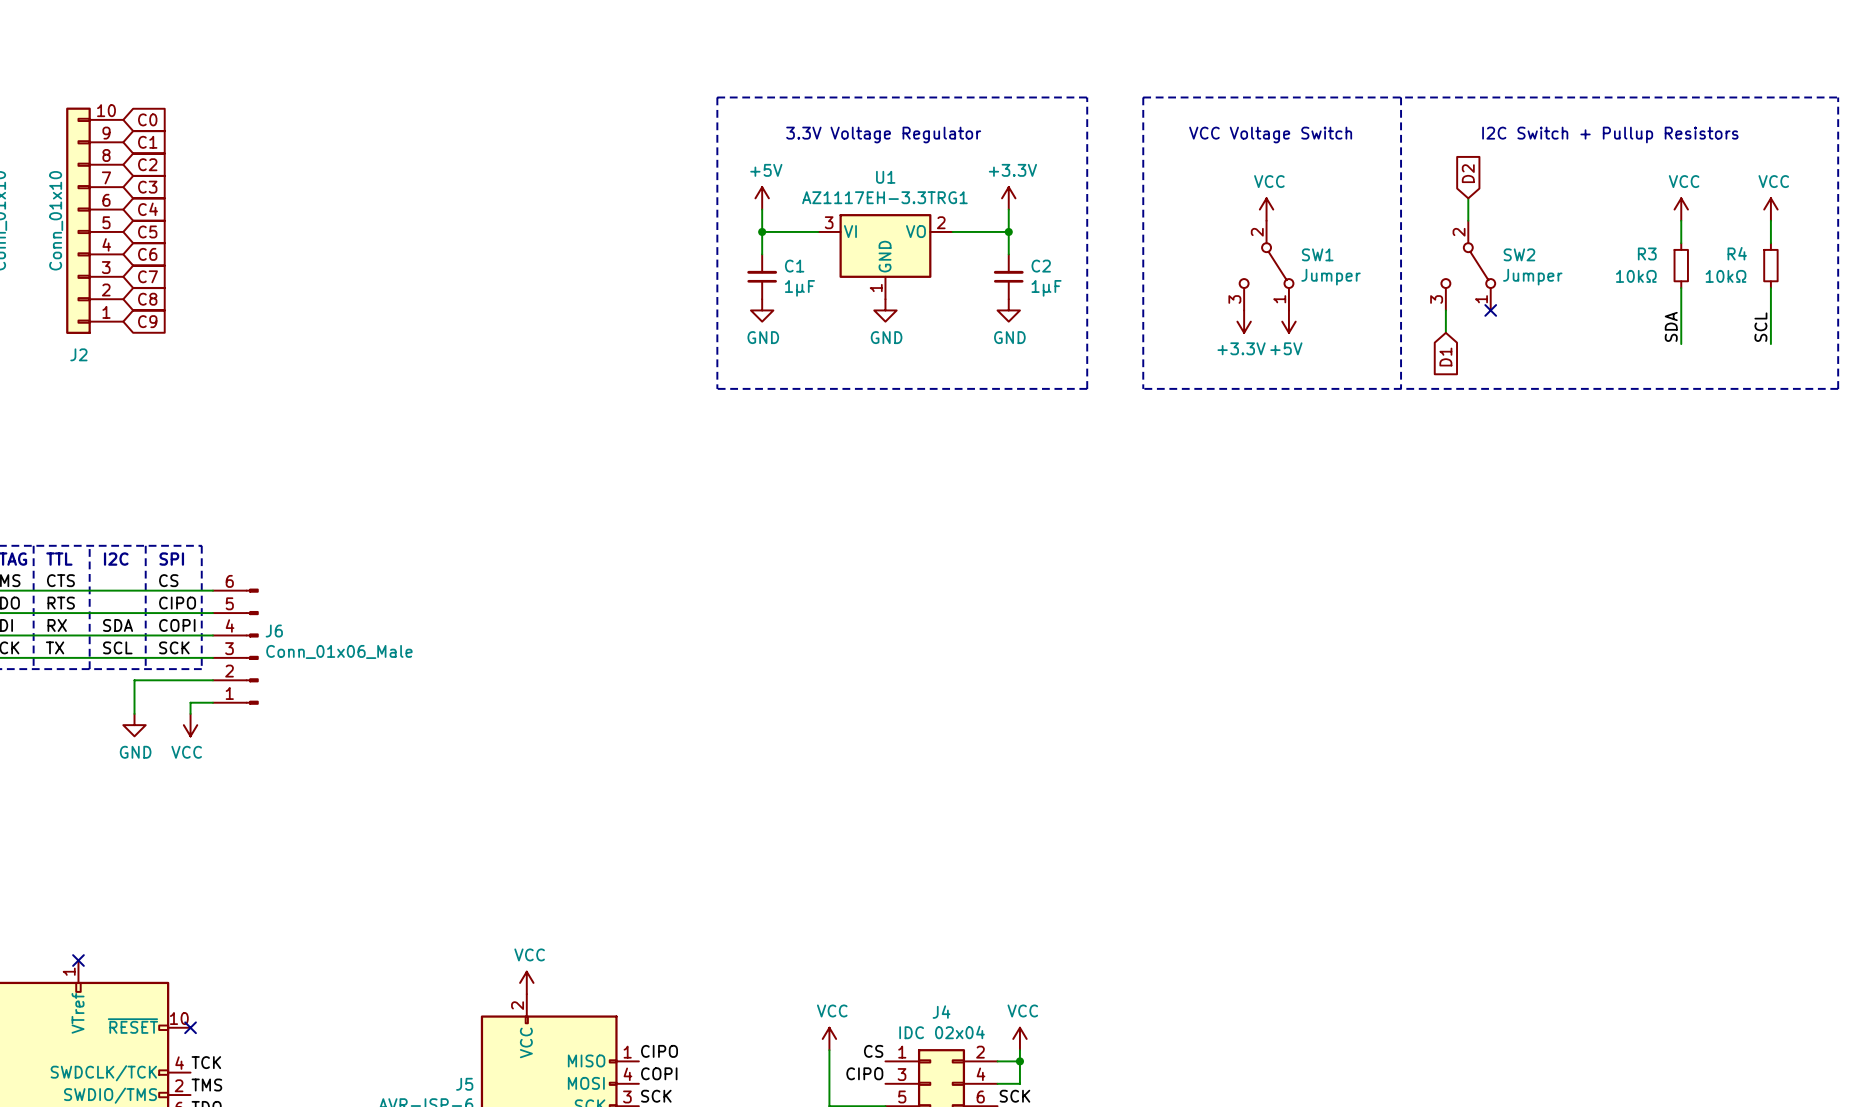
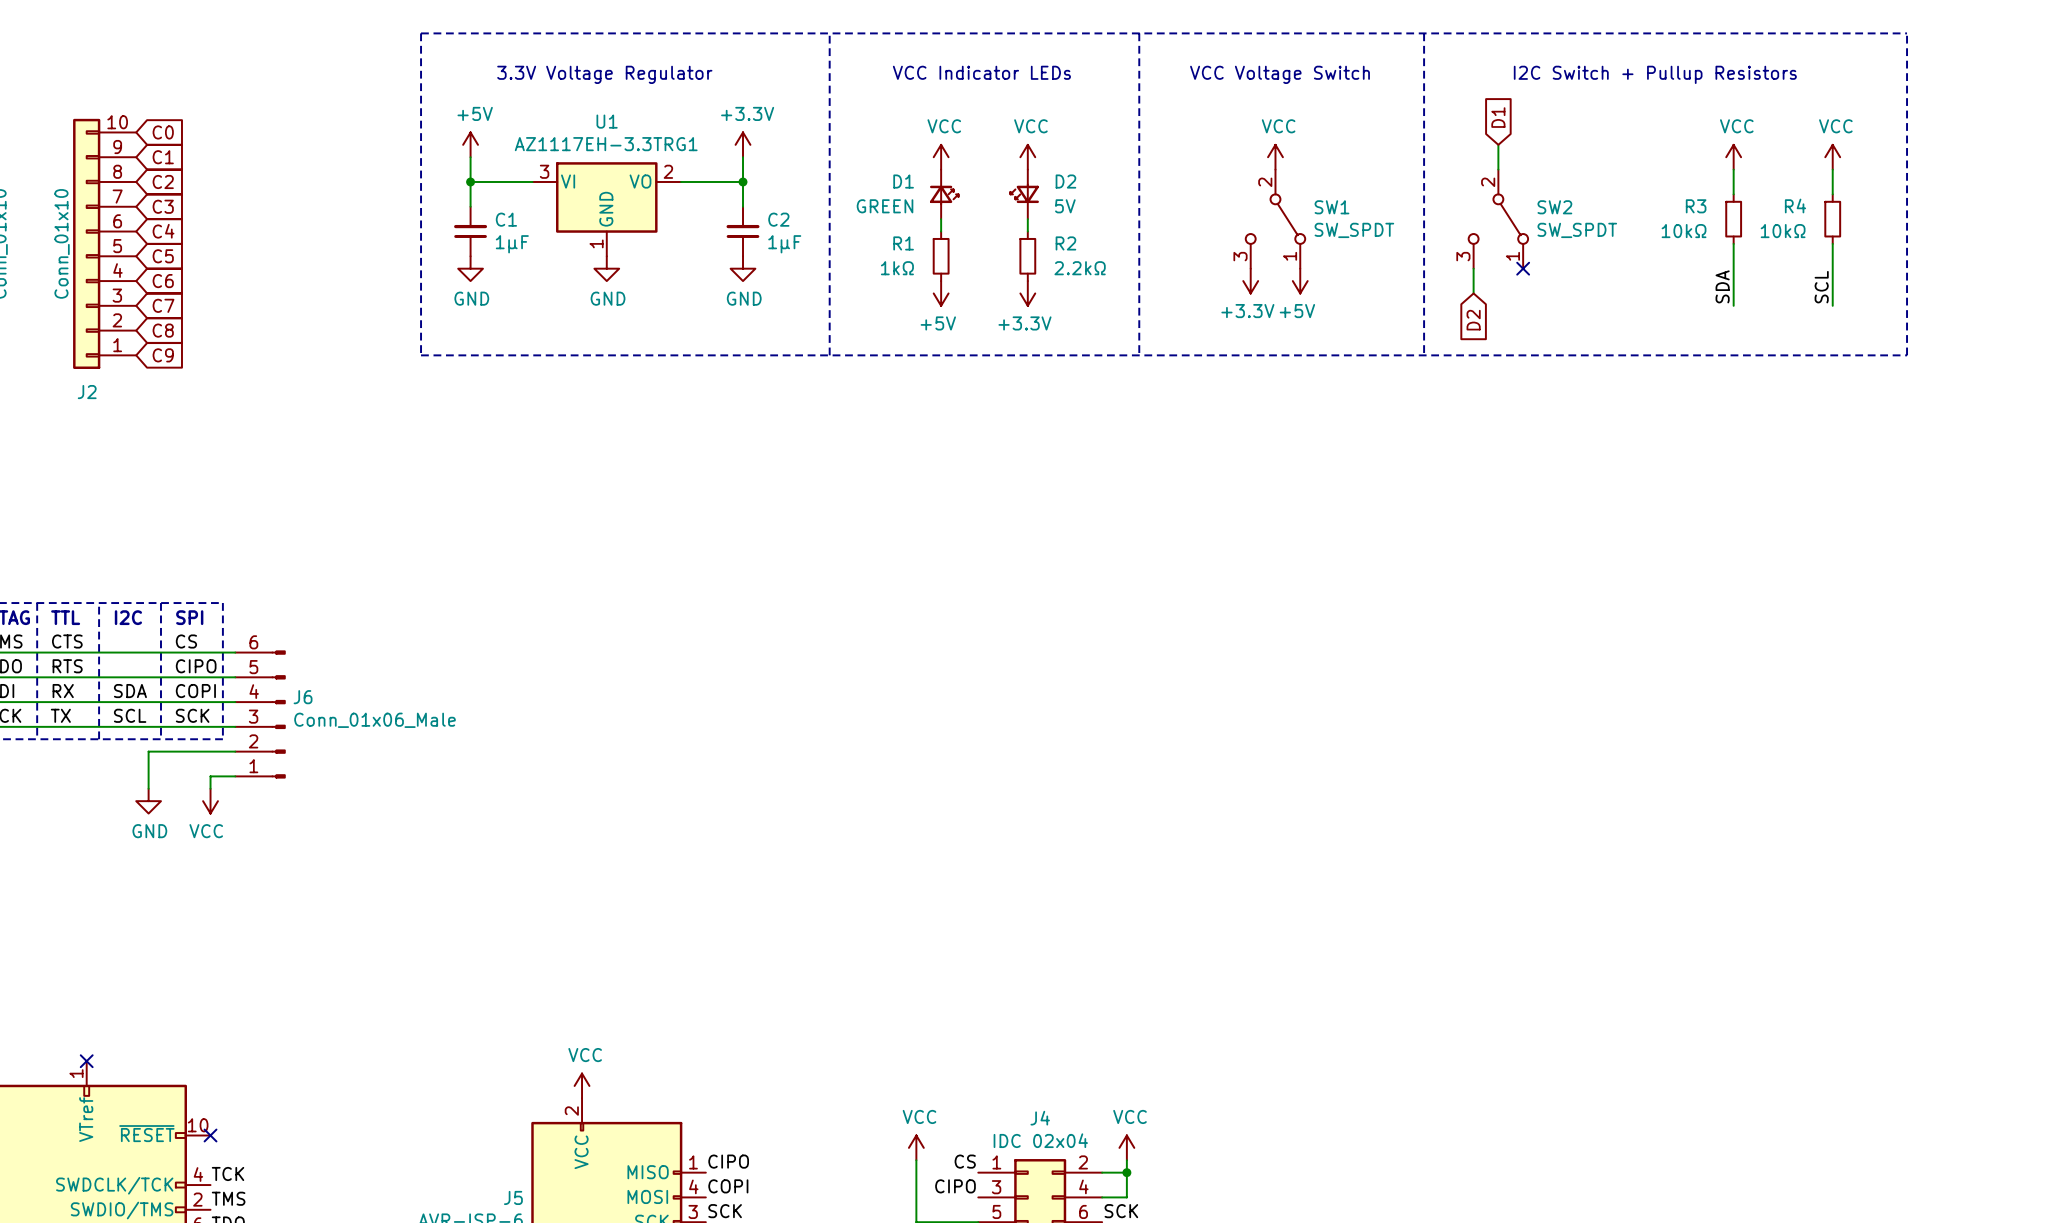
line: none -> (421, 33) (421, 355) (1907, 355) (1907, 33) (421, 33)
line: none -> (829, 33) (829, 355)
line: none -> (1139, 33) (1139, 355)
text: none -> VCC Indicator LEDs (981, 72)
text: none -> 3.3V Voltage Regulator (604, 74)
line: (717, 97) (717, 388) (1087, 388) (1087, 97) (717, 97) -> none
line: (1143, 97) (1143, 388) (1838, 388) (1838, 97) (1143, 97) -> none
line: (1401, 97) (1401, 388) -> (1424, 33) (1424, 355)
global label: none -> D1 (1498, 117)
power symbol: none -> +5V (470, 144)
power symbol: none -> +3.3V (743, 144)
text: 3.3V Voltage Regulator (883, 134) -> none
text position: VCC Voltage Switch (1270, 134) -> VCC Voltage Switch (1280, 74)
text position: I2C Switch + Pullup Resistors (1610, 134) -> I2C Switch + Pullup Resistors (1655, 74)
wire: none -> (470, 157) (470, 206)
power symbol: none -> VCC (941, 157)
power symbol: none -> VCC (1027, 157)
power symbol: none -> VCC (1733, 157)
power symbol: none -> VCC (1832, 157)
wire: none -> (470, 181) (532, 181)
junction: none -> (470, 181)
junction: none -> (743, 181)
global label rotation: 0° (1468, 173) -> 180° (1473, 320)
global label position: D2 (1468, 173) -> D2 (1473, 320)
D1: none -> GREEN (944, 194)
D2: none -> 5V (1024, 194)
power symbol rotation: 0° (762, 198) -> 180° (941, 293)
power symbol position: +5V (762, 198) -> +5V (941, 293)
wire: none -> (941, 219) (941, 231)
wire: none -> (1027, 219) (1027, 231)
power symbol: +3.3V (1008, 198) -> none
wire: (1468, 198) (1468, 220) -> (1498, 144) (1498, 169)
wire: (762, 209) (762, 254) -> (743, 157) (743, 206)
wire: (1008, 209) (1008, 254) -> none
power symbol position: VCC (1266, 209) -> VCC (1275, 157)
power symbol: VCC (1681, 209) -> none
power symbol: VCC (1770, 209) -> none
wire: (1681, 220) (1681, 243) -> (1733, 169) (1733, 194)
wire: (1770, 220) (1770, 243) -> (1832, 169) (1832, 194)
wire: (762, 231) (818, 231) -> (681, 181) (743, 181)
junction: (762, 231) -> none
R1: none -> 1kΩ (941, 256)
R2: none -> 2.2kΩ (1027, 256)
wire: (952, 231) (1008, 231) -> none
junction: (1008, 231) -> none
power symbol: none -> GND (470, 268)
power symbol: none -> GND (606, 268)
power symbol: none -> GND (743, 268)
no-connect mark: none -> (1523, 268)
power symbol: none -> +3.3V (1250, 281)
U1 position: (885, 256) -> (606, 209)
power symbol: none -> +3.3V (1027, 293)
SW1 position: (1266, 265) -> (1275, 219)
SW2 position: (1468, 265) -> (1498, 219)
R3 position: (1681, 265) -> (1733, 219)
R4 position: (1770, 265) -> (1832, 219)
C1 position: (762, 276) -> (470, 231)
C2 position: (1008, 276) -> (743, 231)
SW1 value: Jumper (1331, 277) -> SW_SPDT (1354, 230)
SW2 value: Jumper (1532, 277) -> SW_SPDT (1577, 230)
wire: (1681, 288) (1681, 344) -> (1733, 243) (1733, 305)
wire: (1770, 288) (1770, 344) -> (1832, 243) (1832, 305)
power symbol: GND (762, 310) -> none
power symbol: GND (885, 310) -> none
power symbol: GND (1008, 310) -> none
wire: (1445, 310) (1445, 332) -> (1473, 268) (1473, 293)
no-connect mark: (1490, 310) -> none
power symbol: +3.3V (1244, 321) -> none
power symbol position: +5V (1288, 321) -> +5V (1300, 281)
label position: SDA (1671, 326) -> SDA (1722, 286)
label position: SCL (1760, 327) -> SCL (1821, 287)
global label: D1 (1445, 357) -> none

